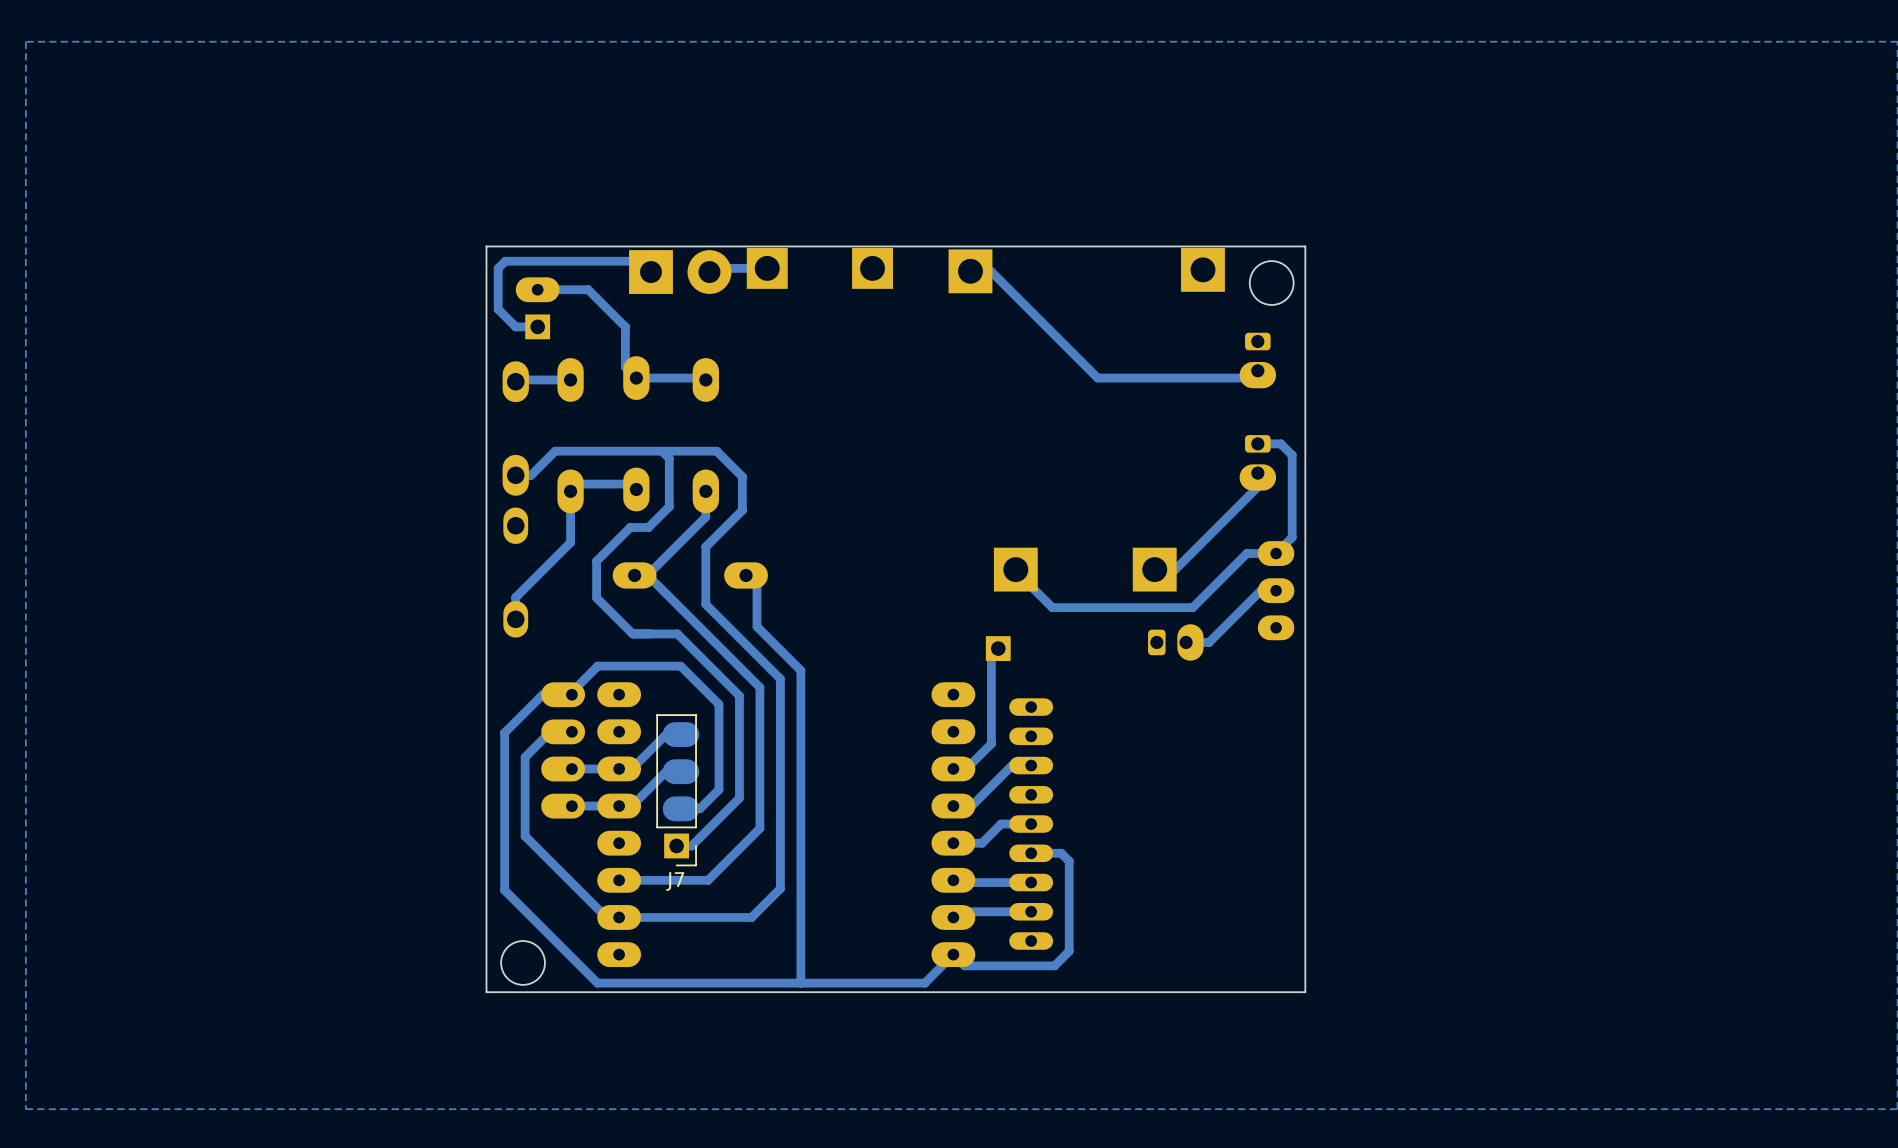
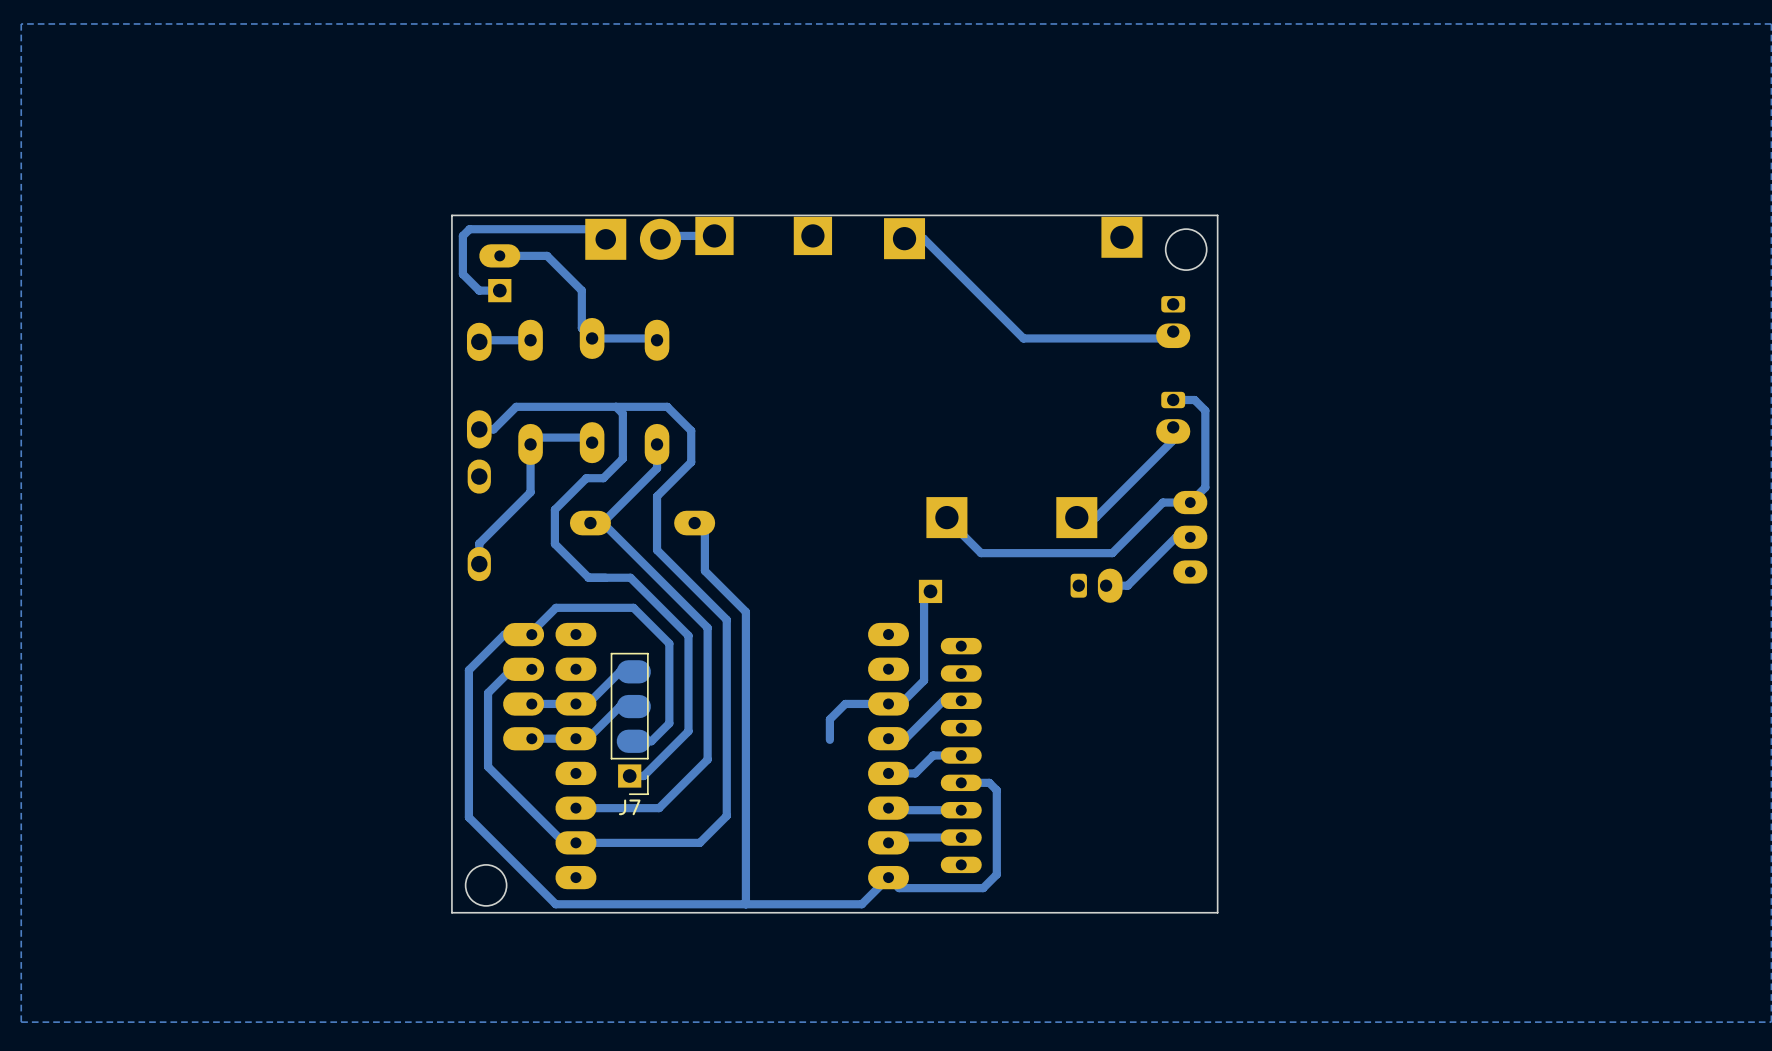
track: none -> (888, 703) (845, 703) (829, 719) (829, 739)

